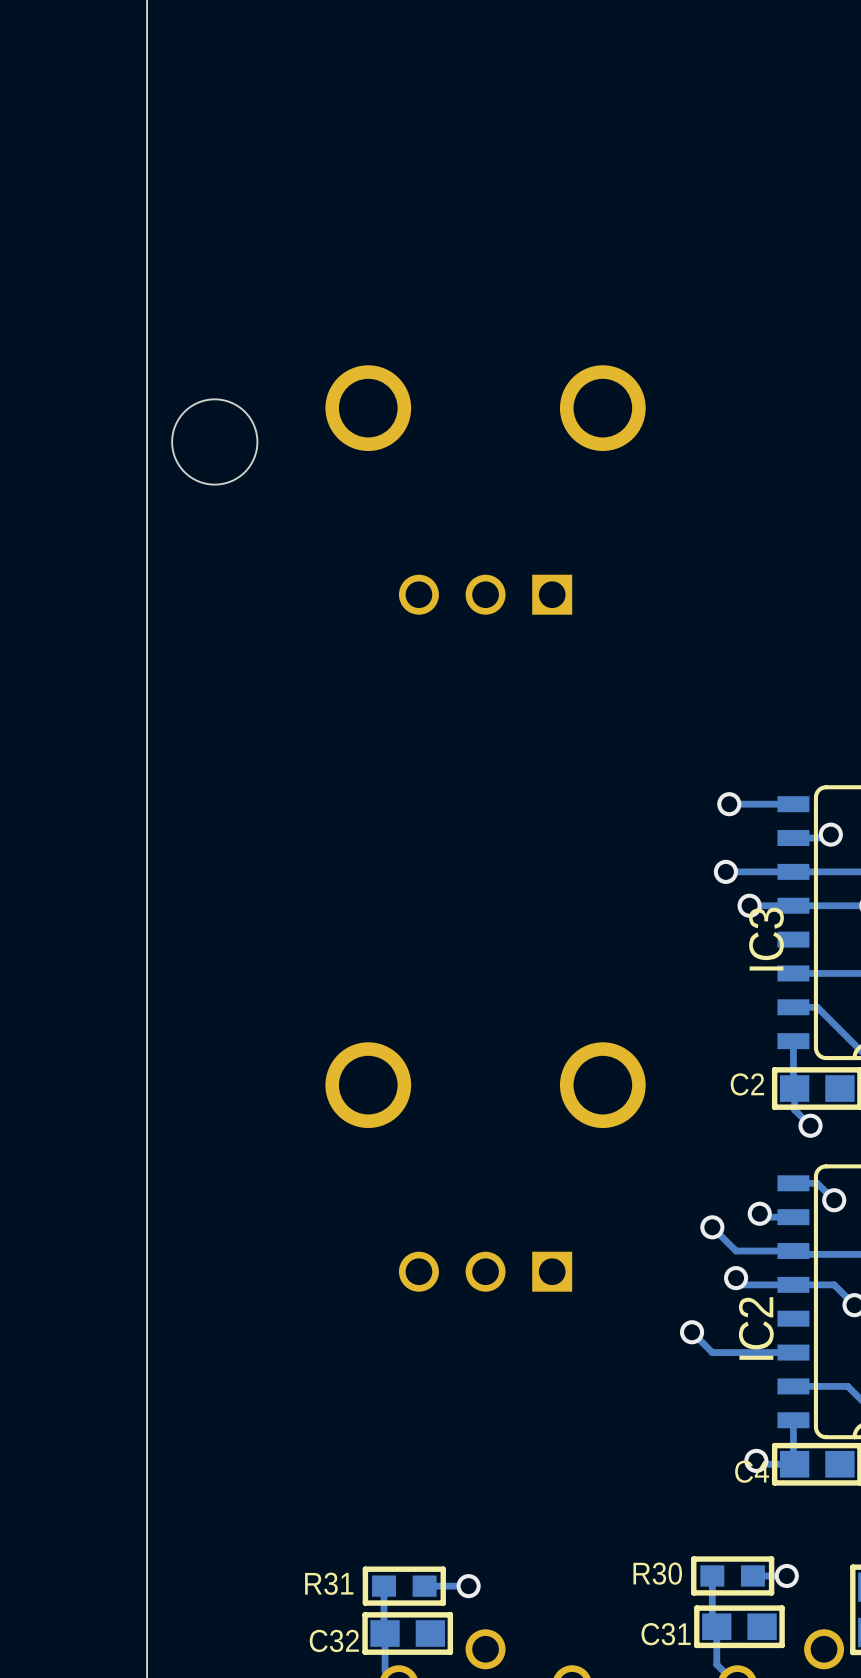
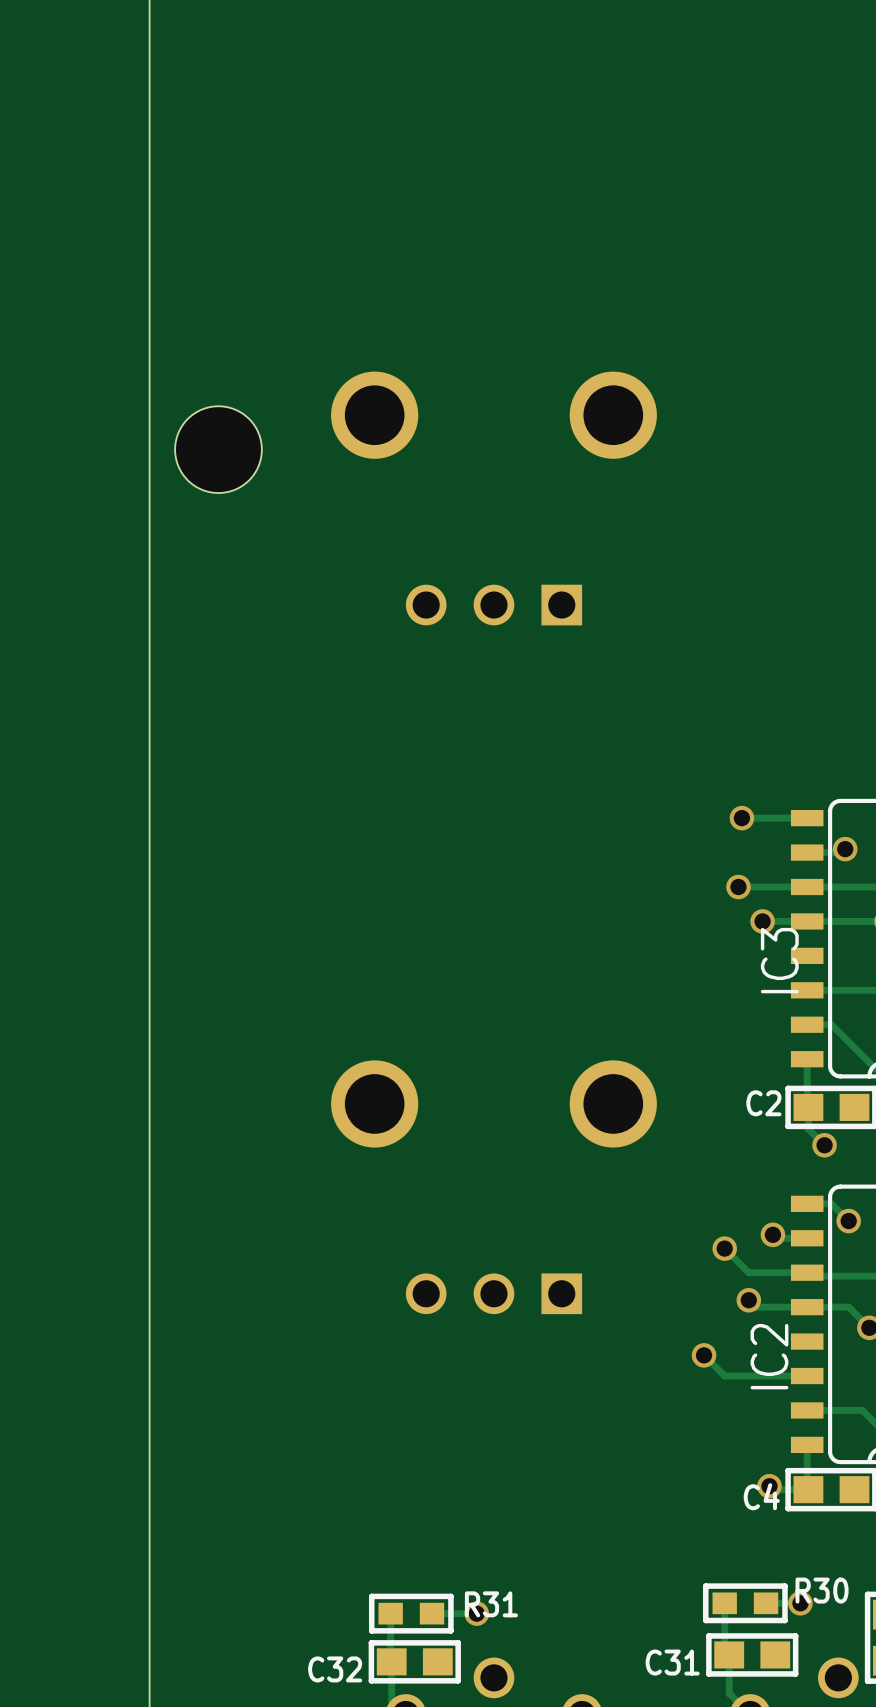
R30 name position: R30 (657, 1573) -> R30 (822, 1590)
R31 name position: R31 (329, 1583) -> R31 (491, 1604)

